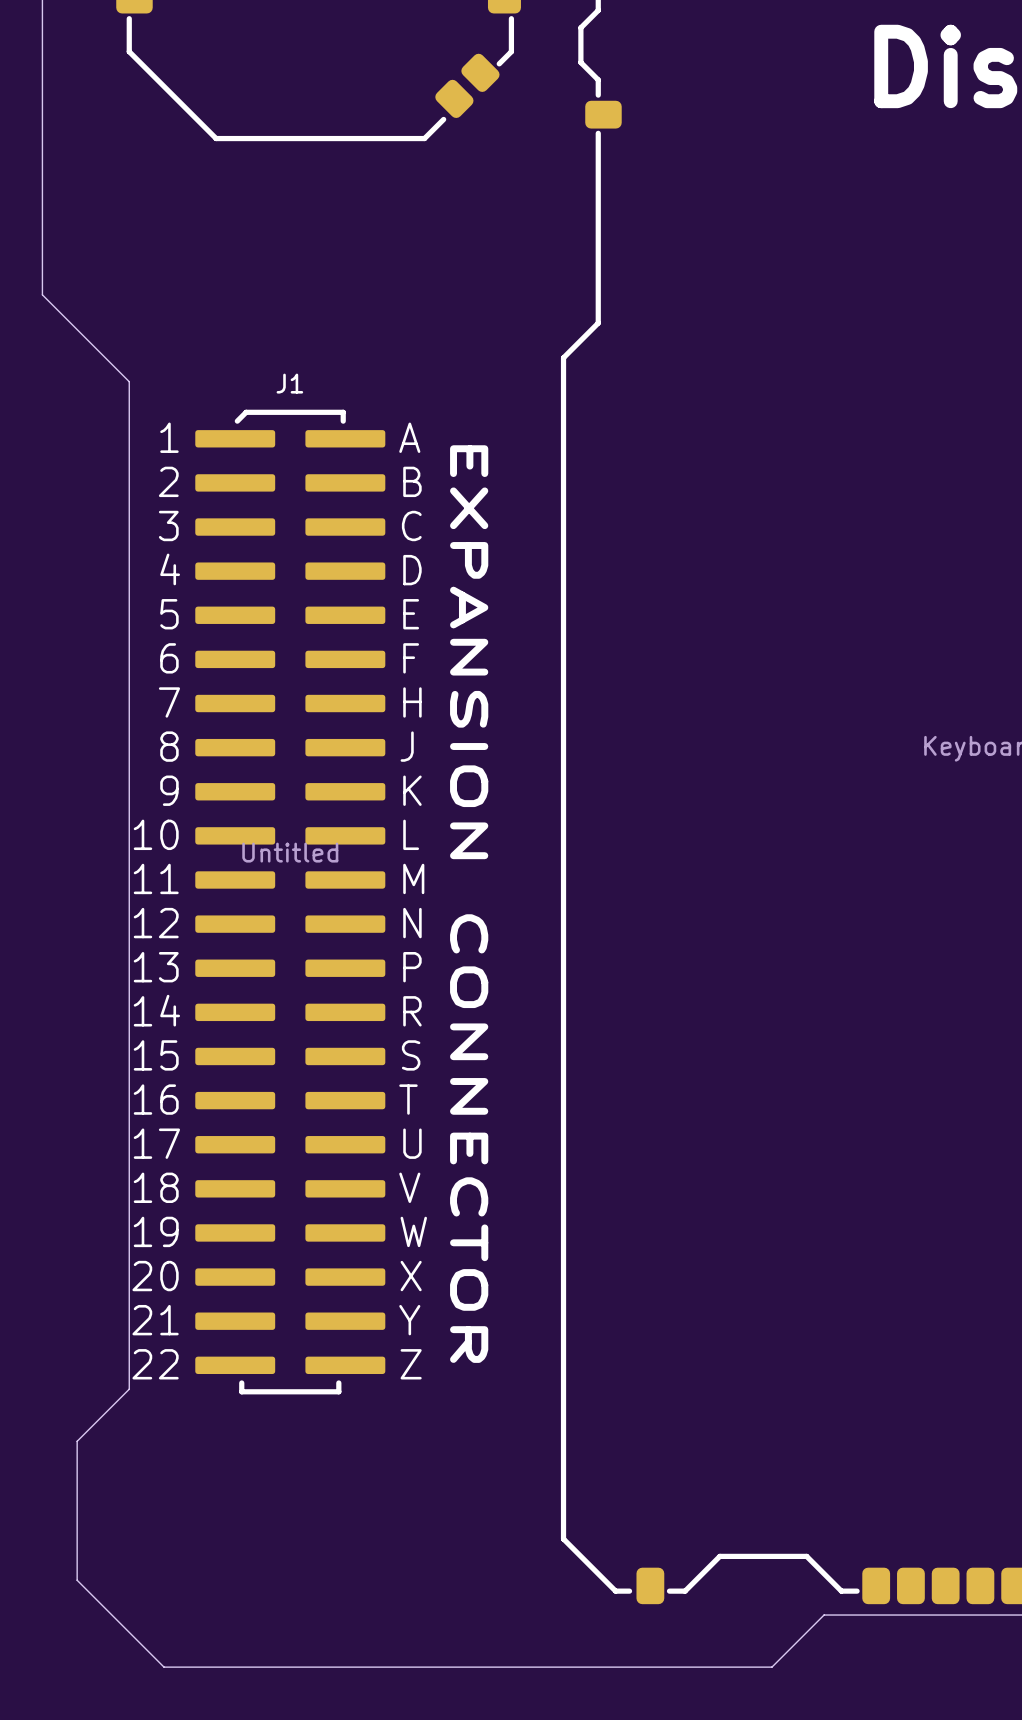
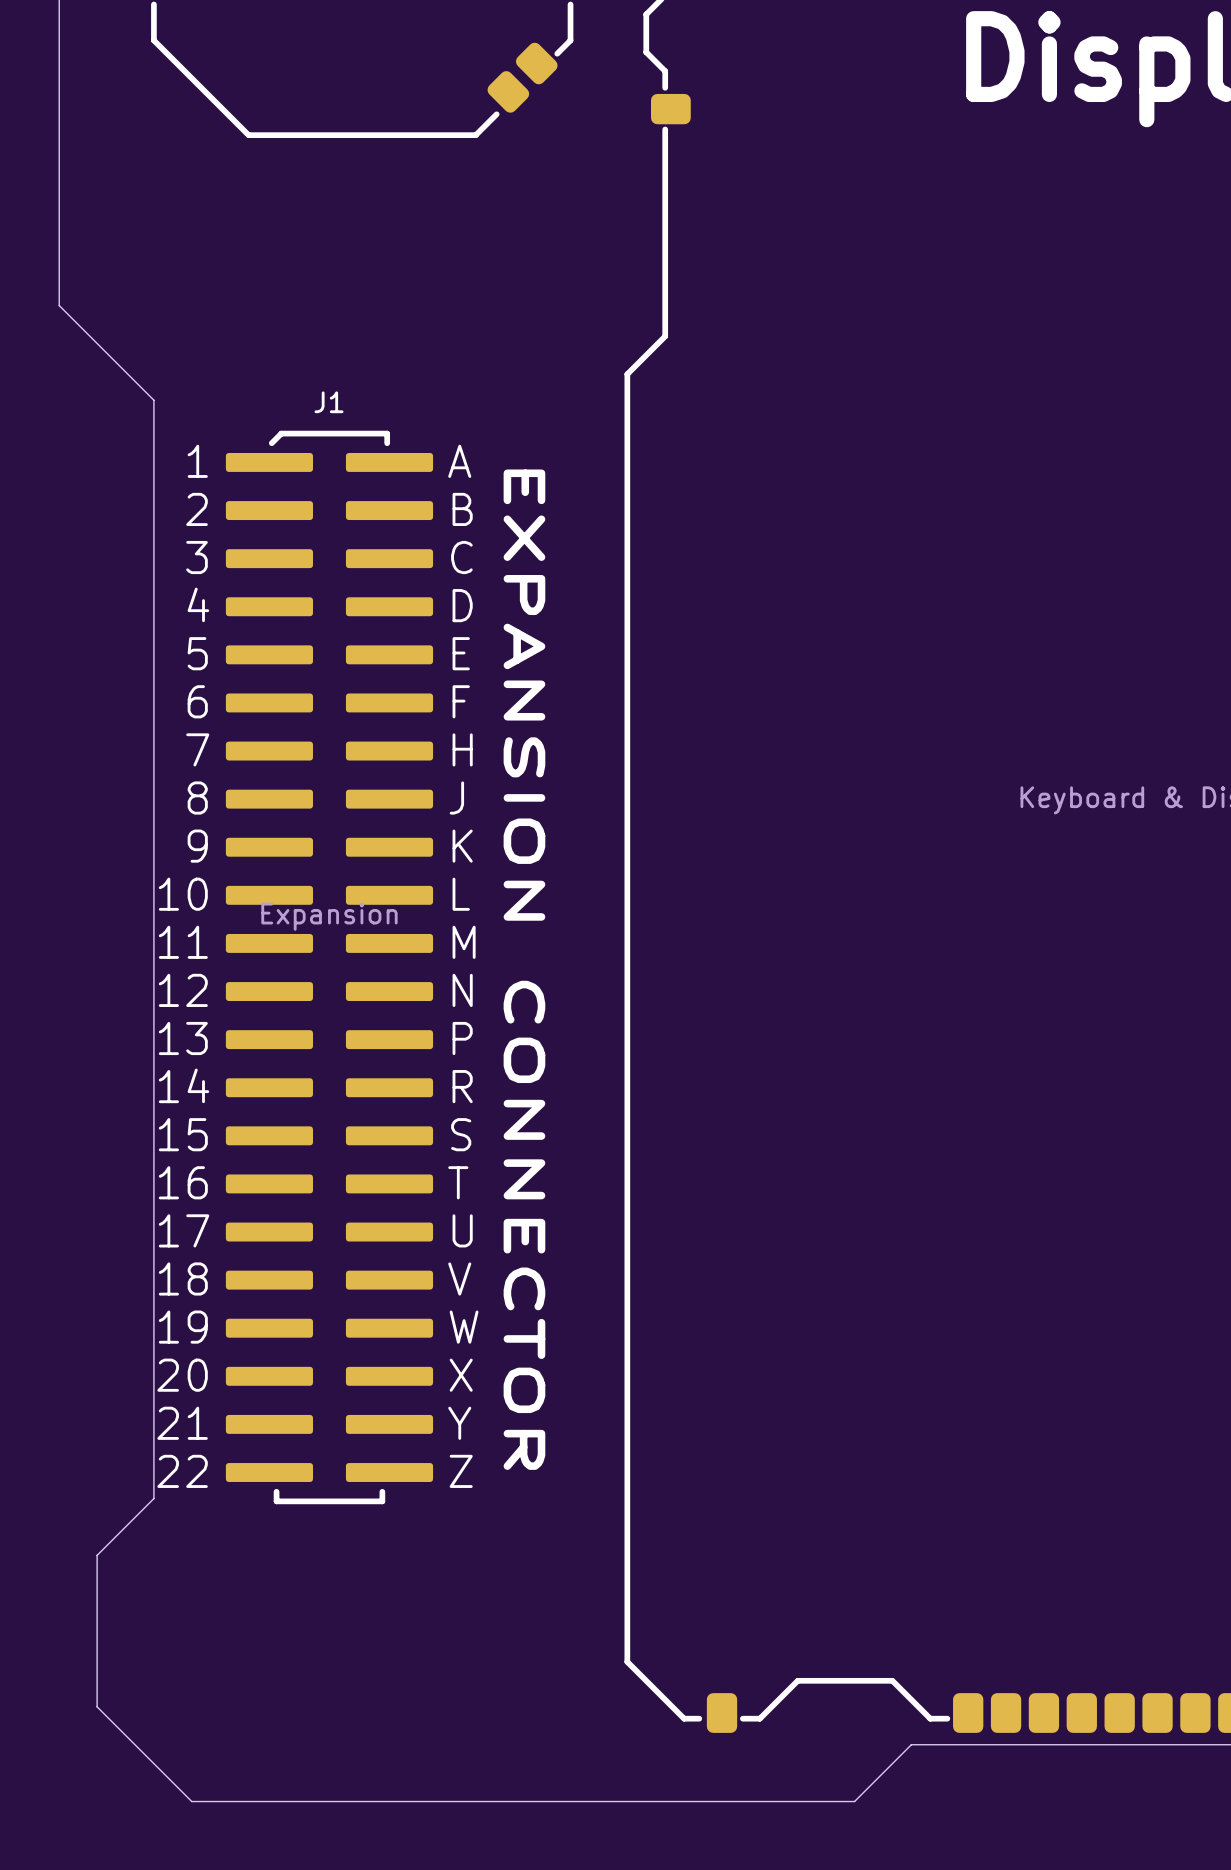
J1 value: Untitled (290, 852) -> Expansion (329, 916)

